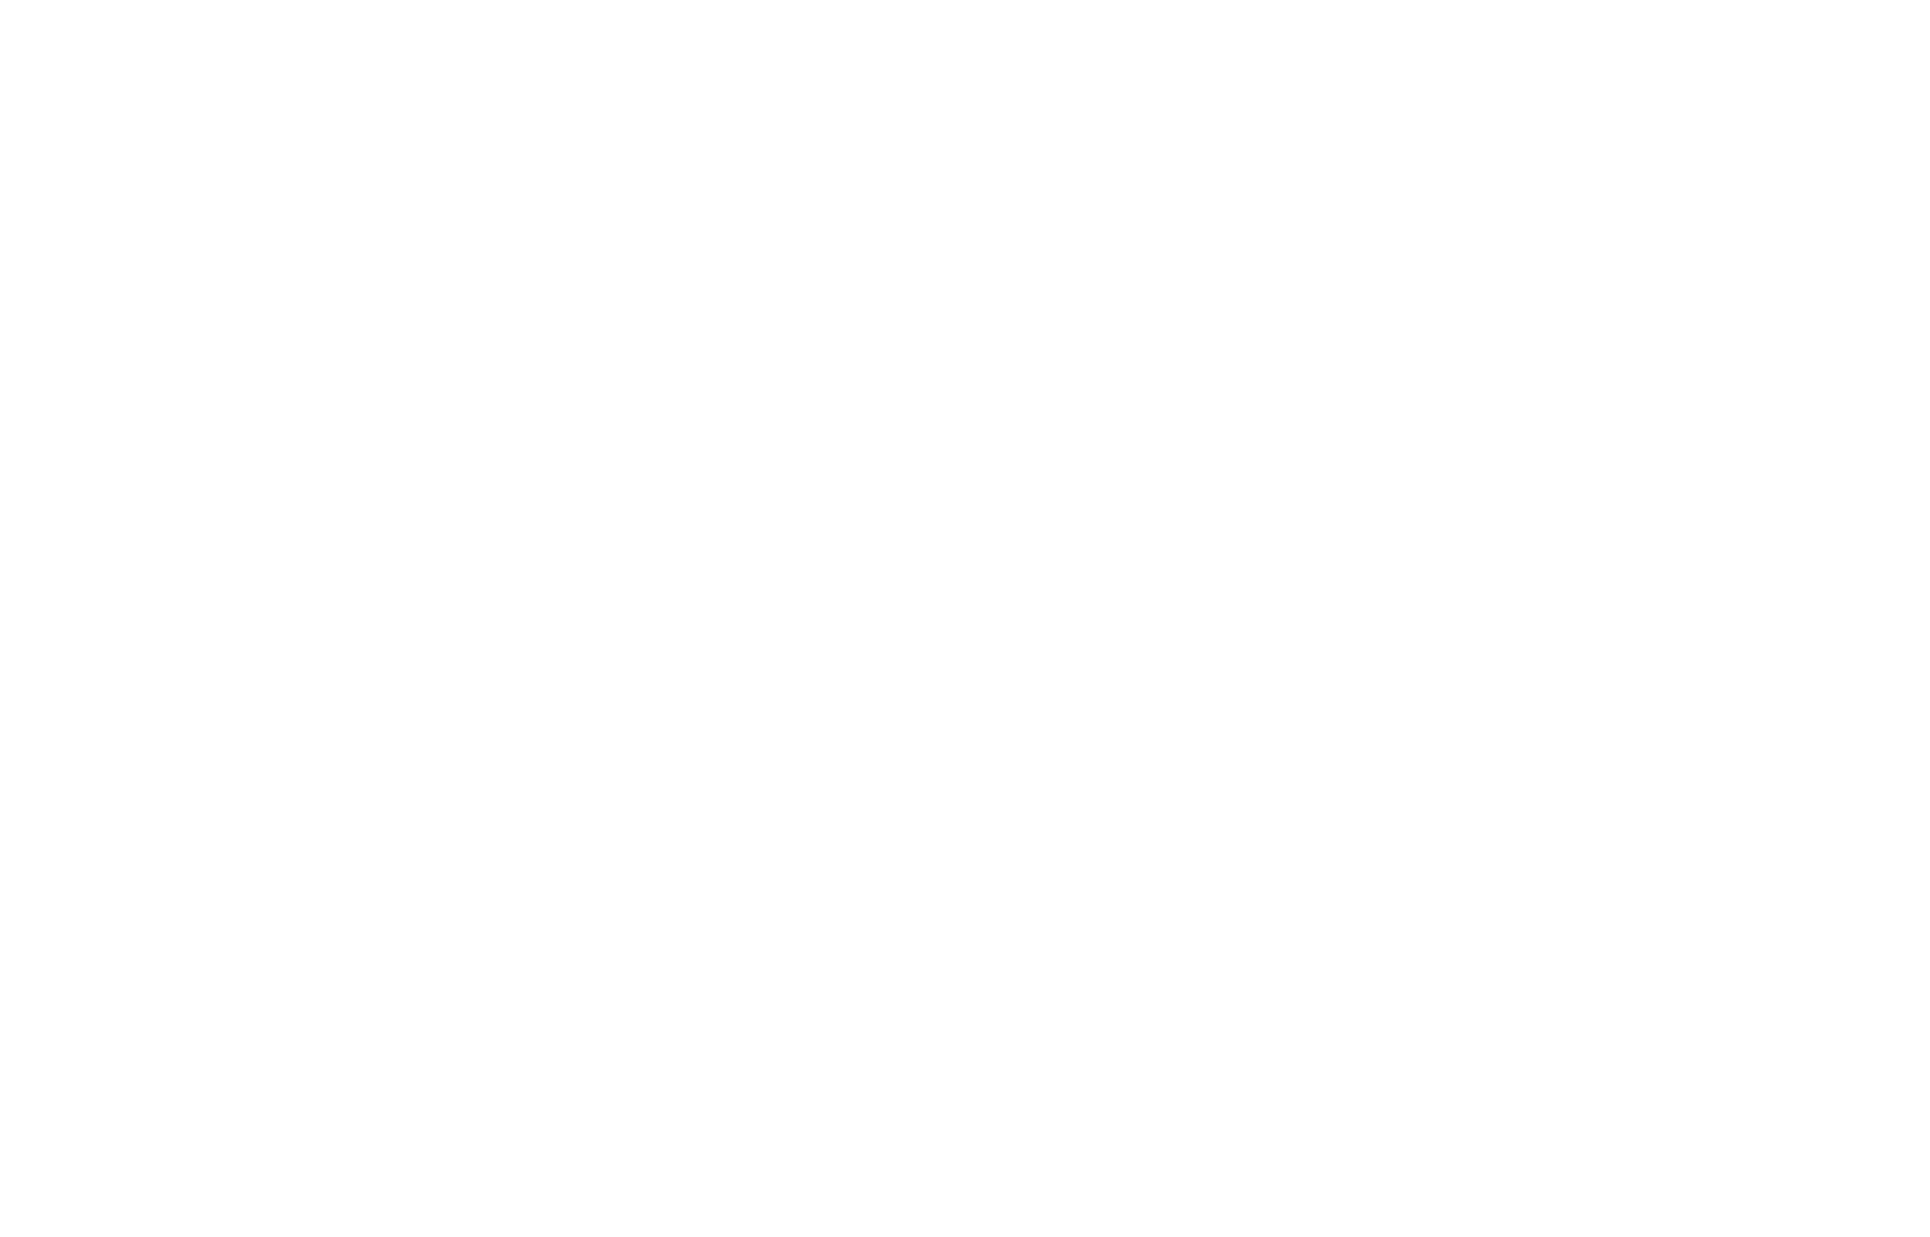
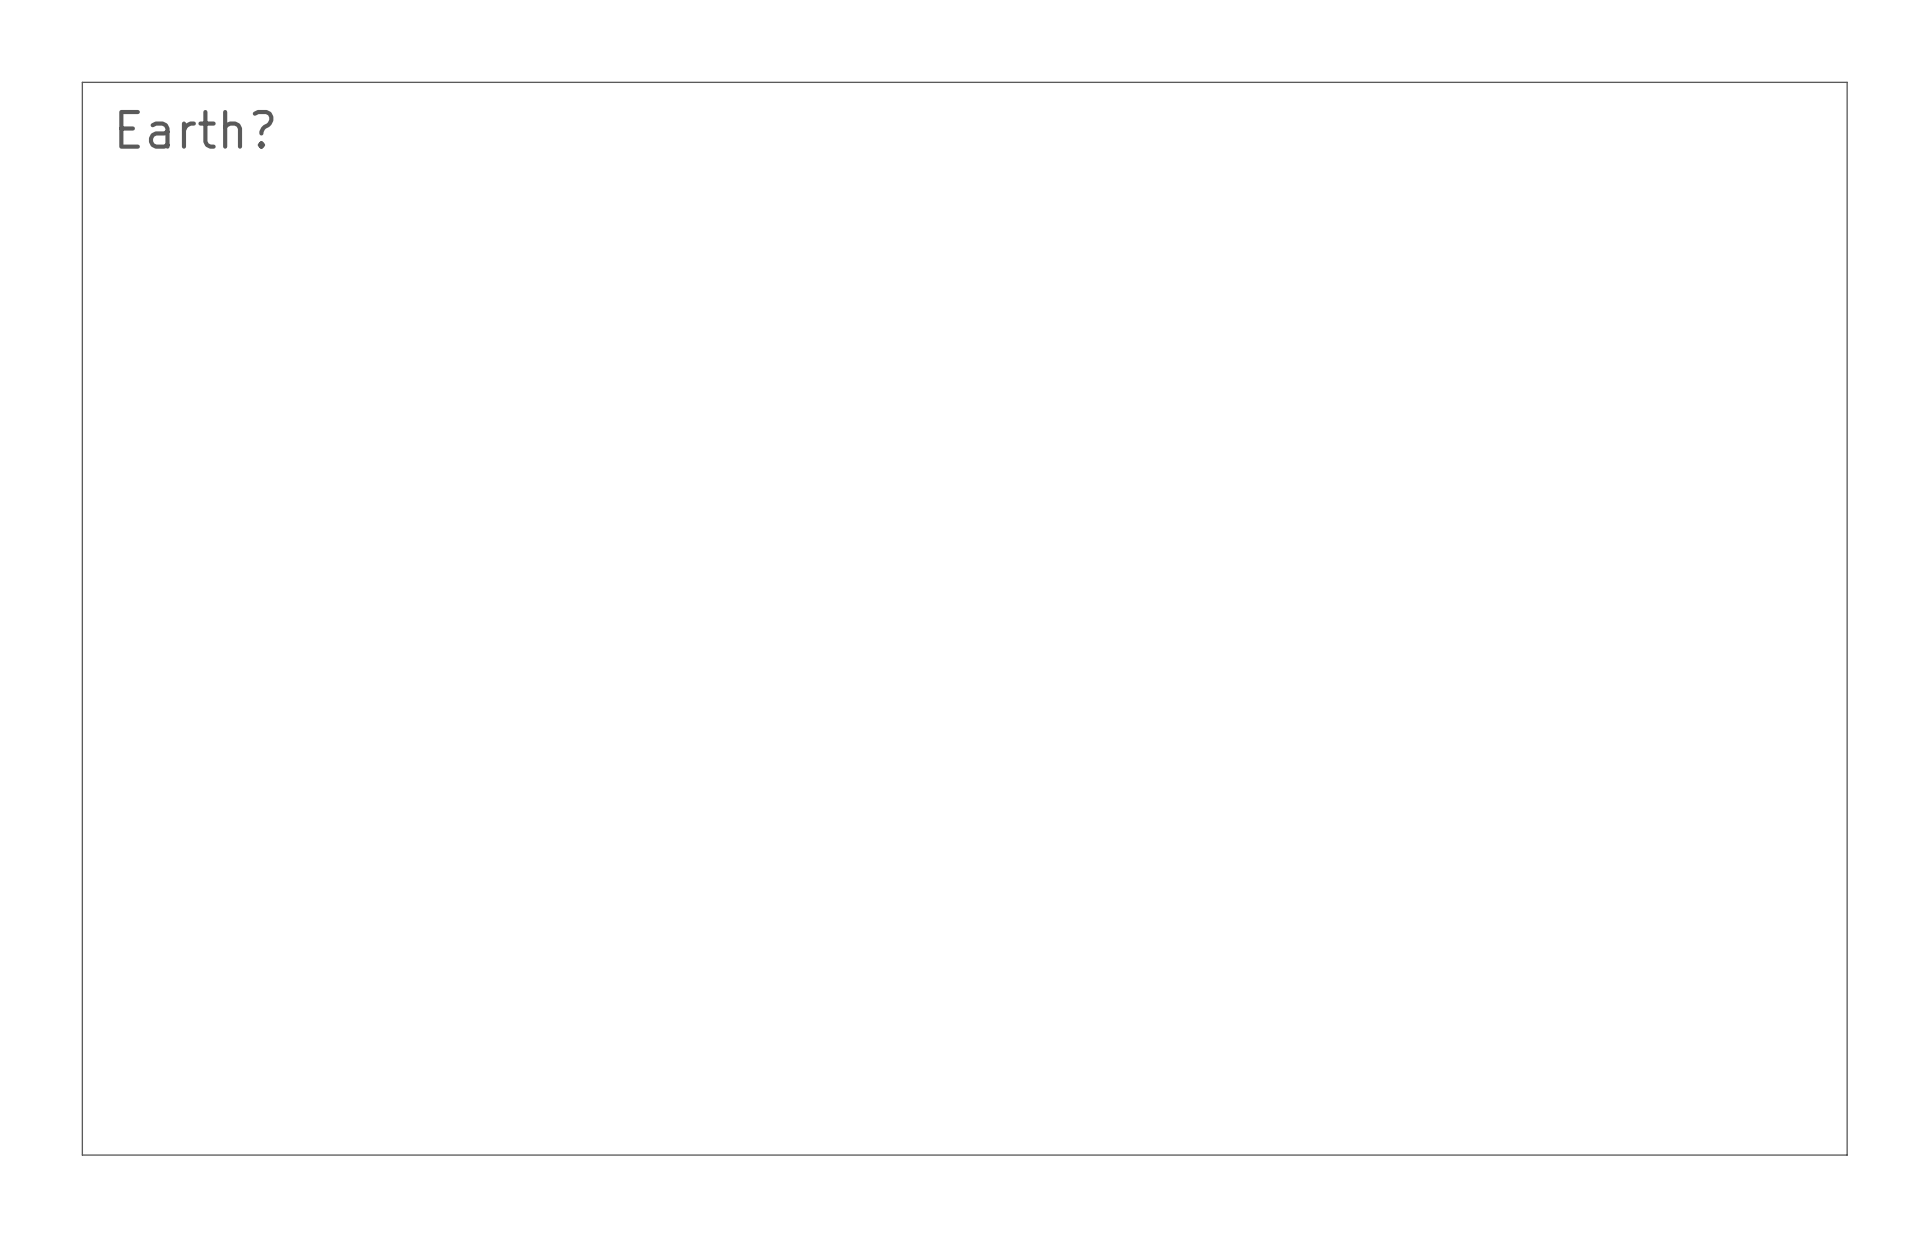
line: none -> (82, 82) (1847, 82) (1847, 1155) (82, 1155) (82, 82)
text: none -> Earth? (196, 129)

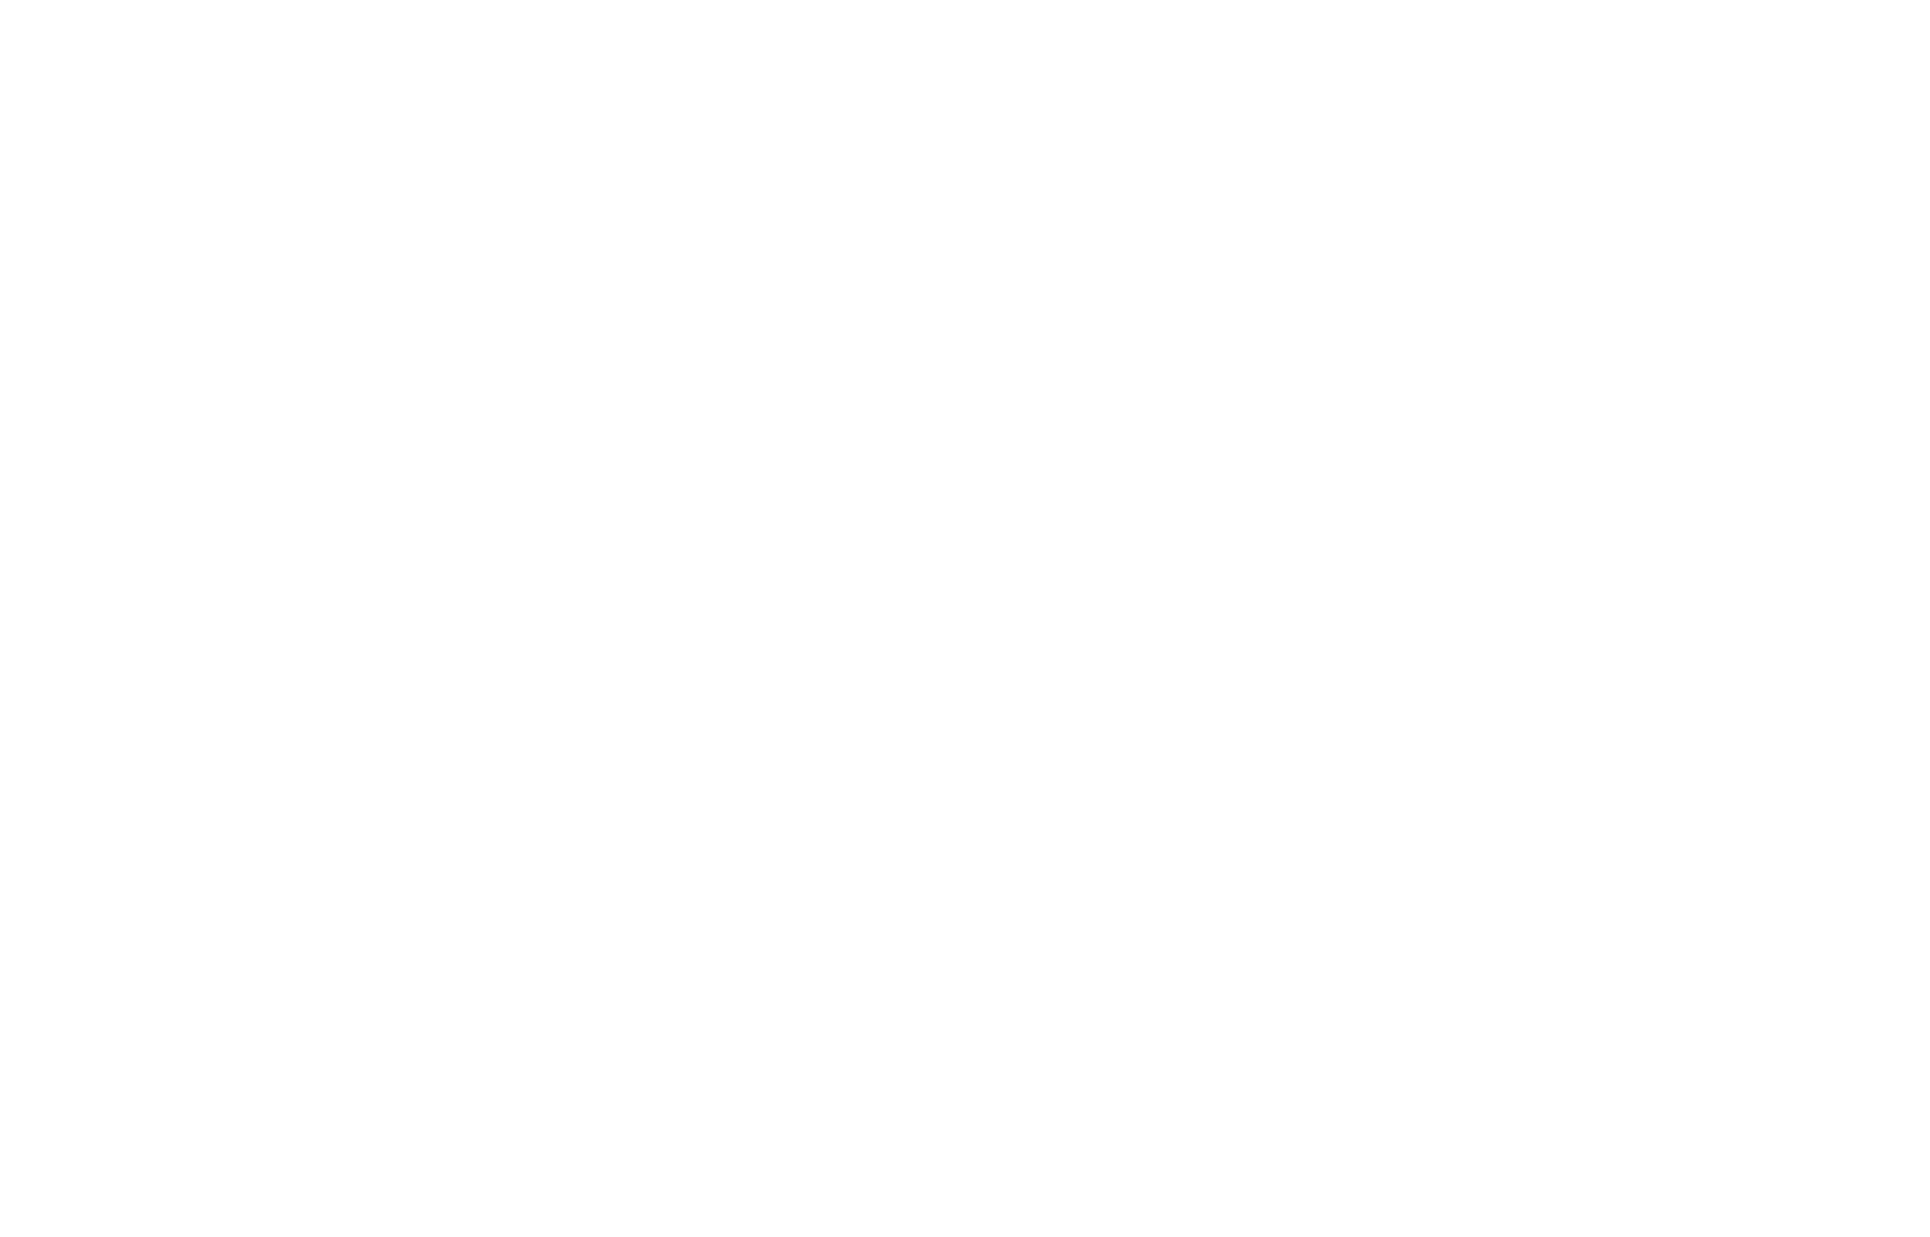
line: (82, 82) (1847, 82) (1847, 1155) (82, 1155) (82, 82) -> none
text: Earth? (196, 129) -> none

